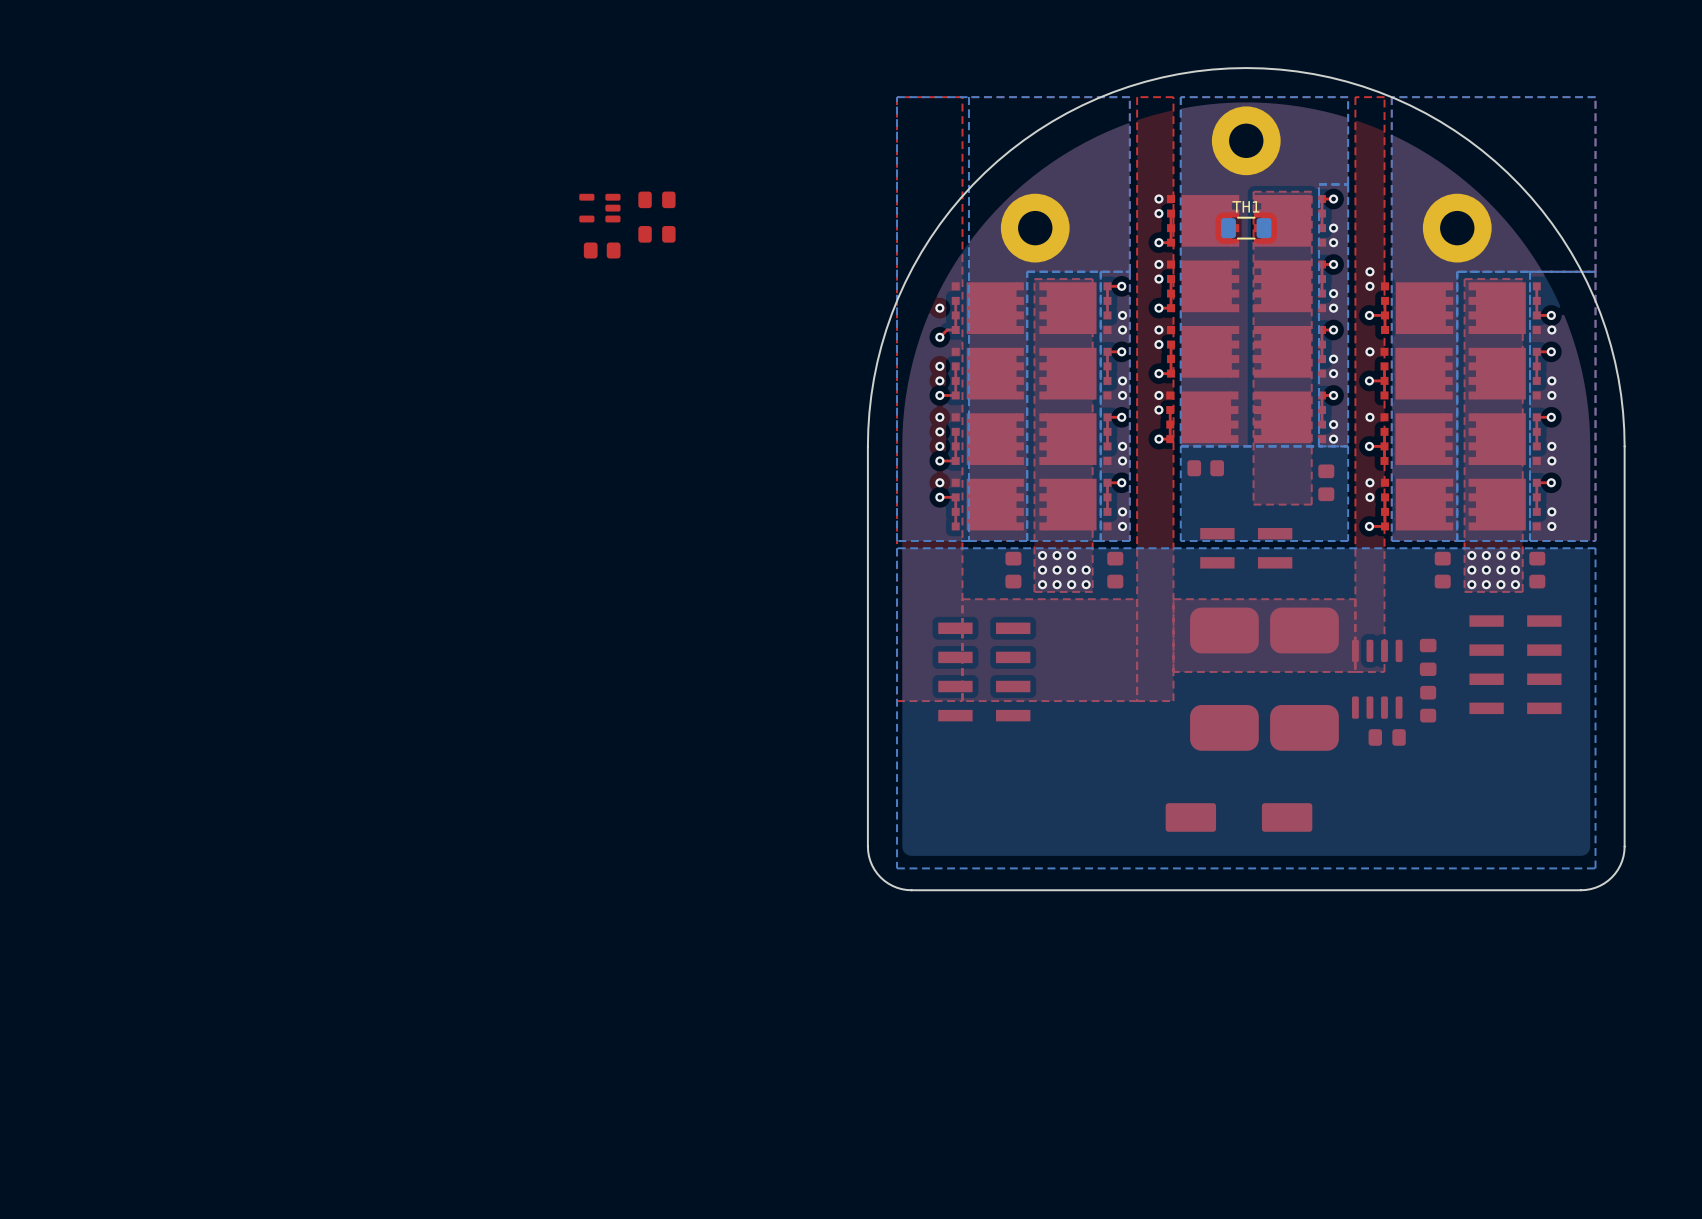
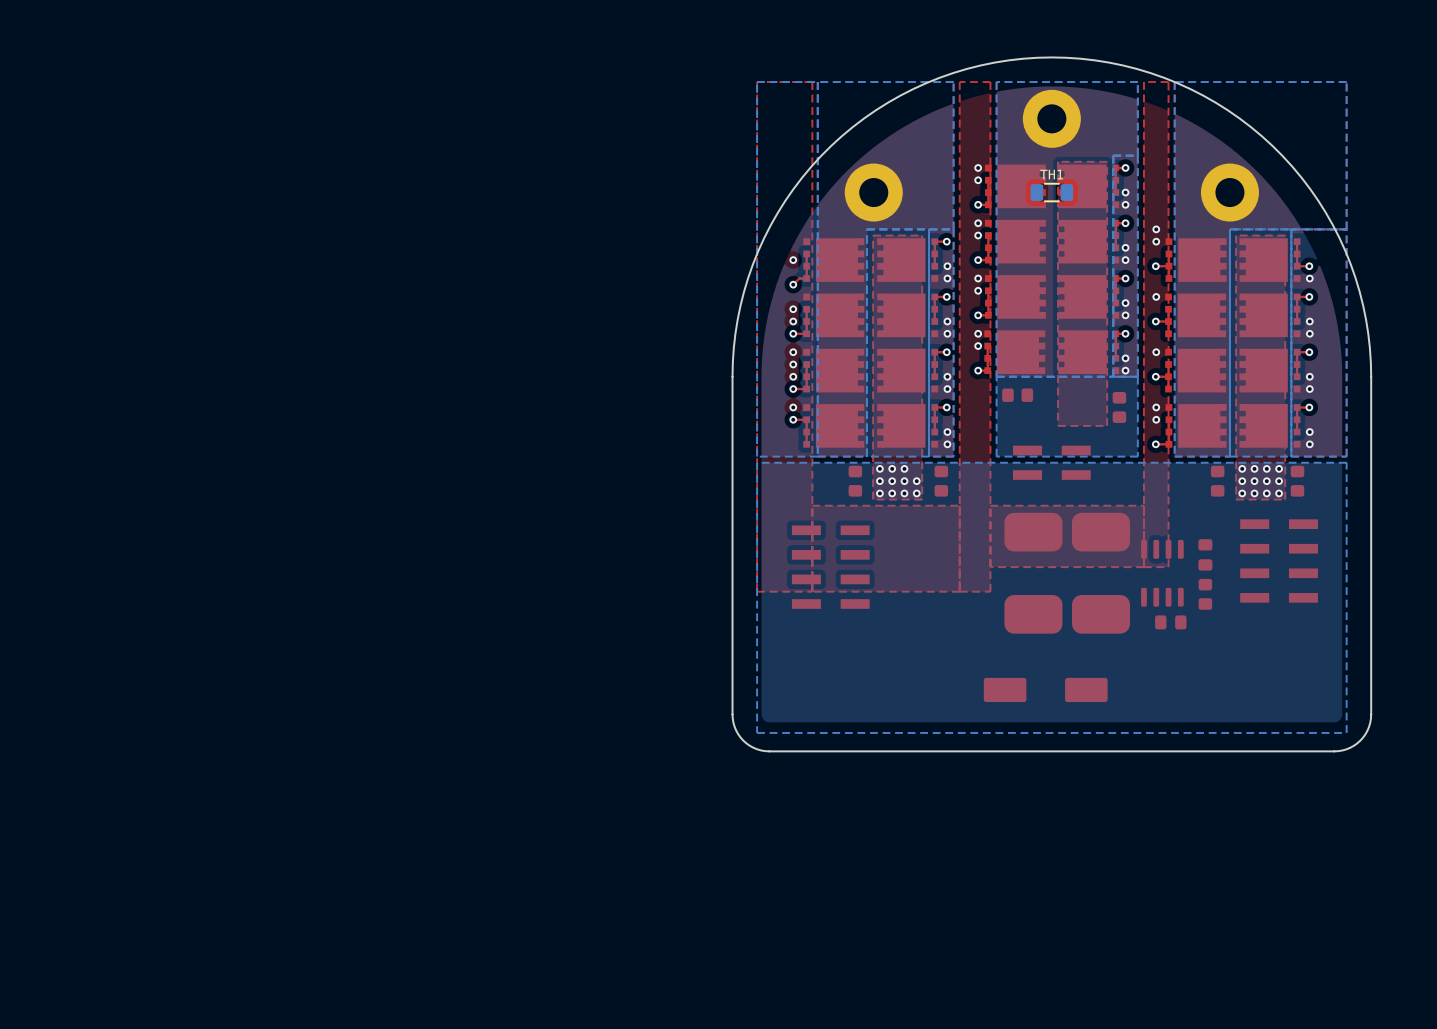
part: (656, 199) -> none
part: (599, 208) -> none
part: (656, 234) -> none
part: (602, 250) -> none

